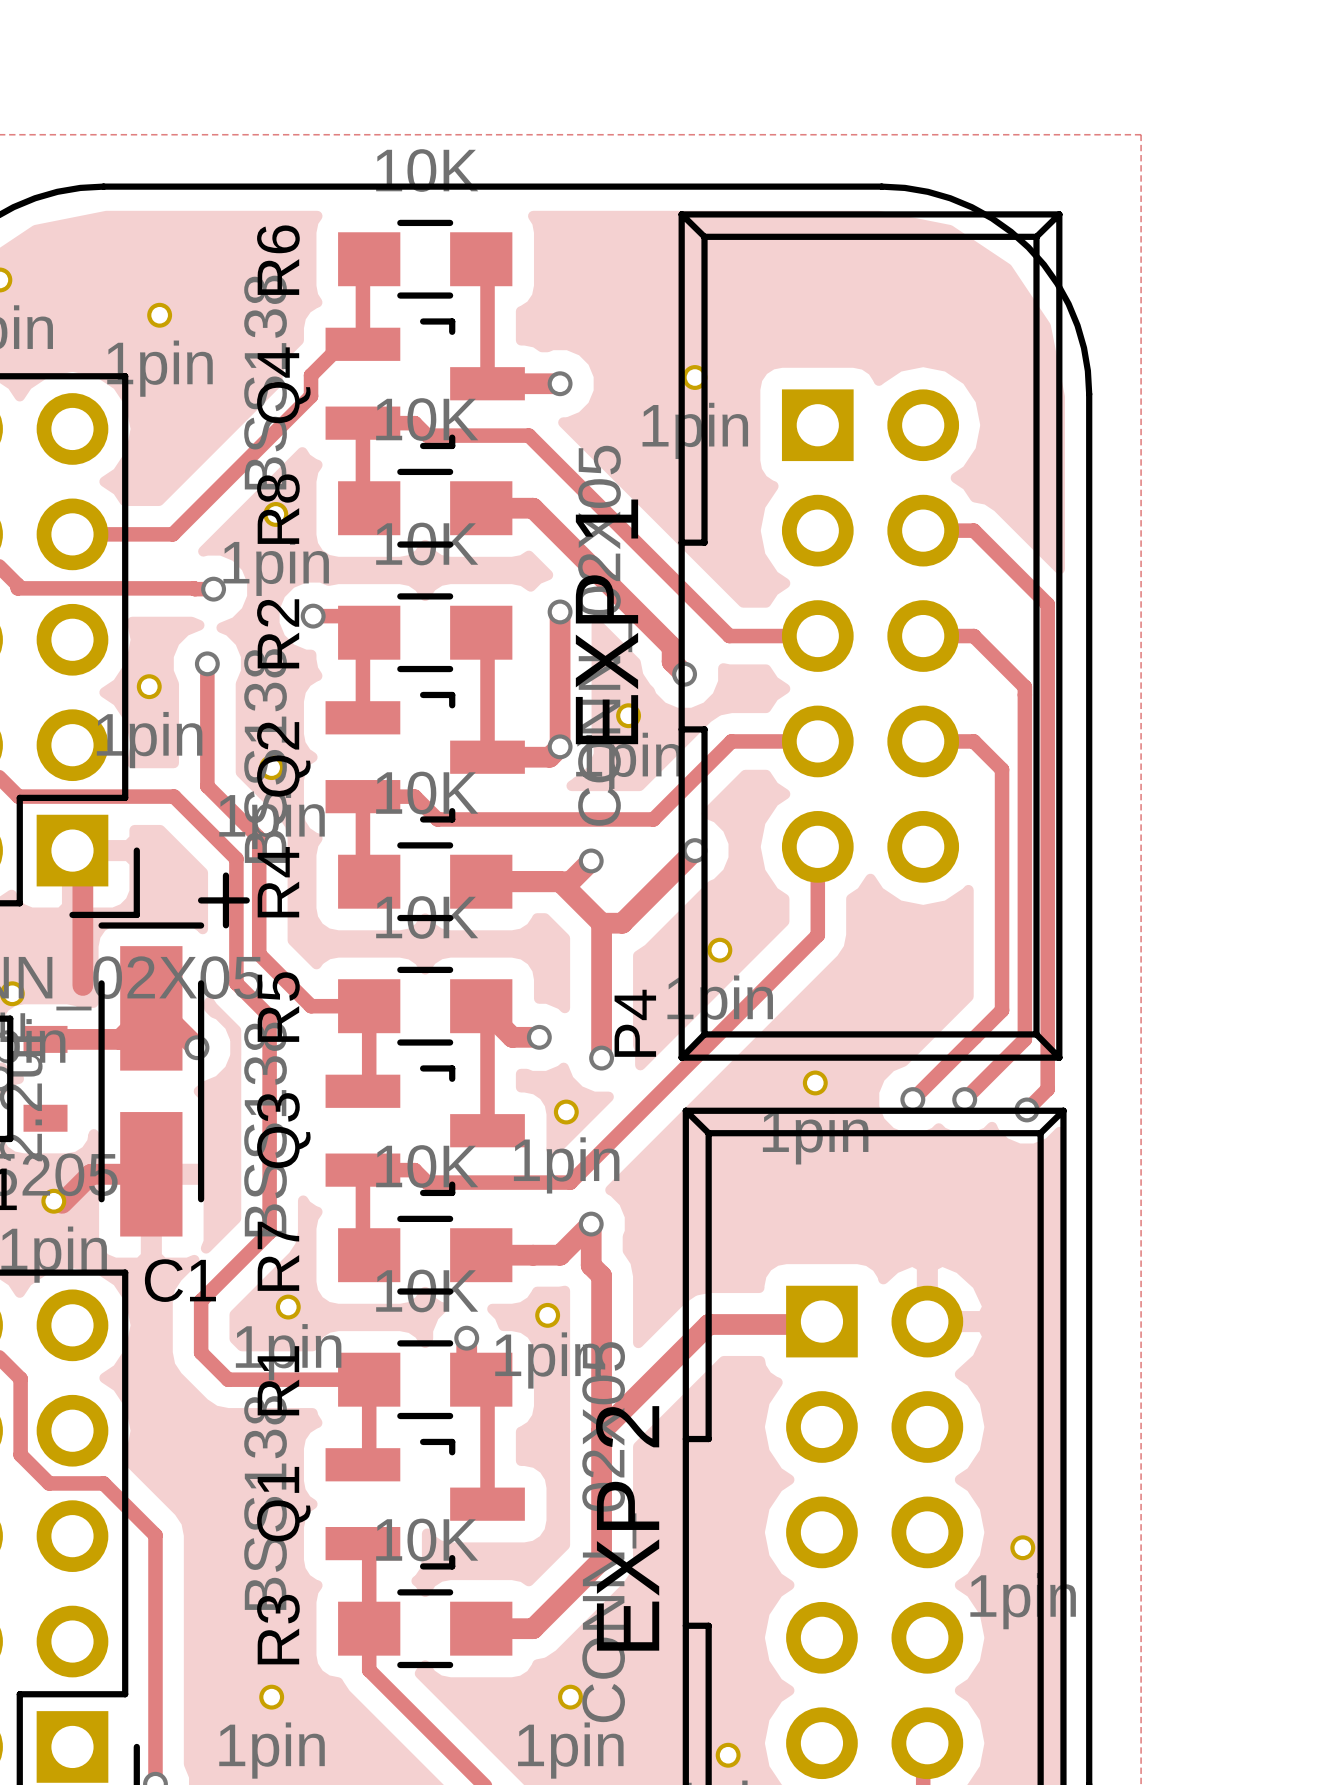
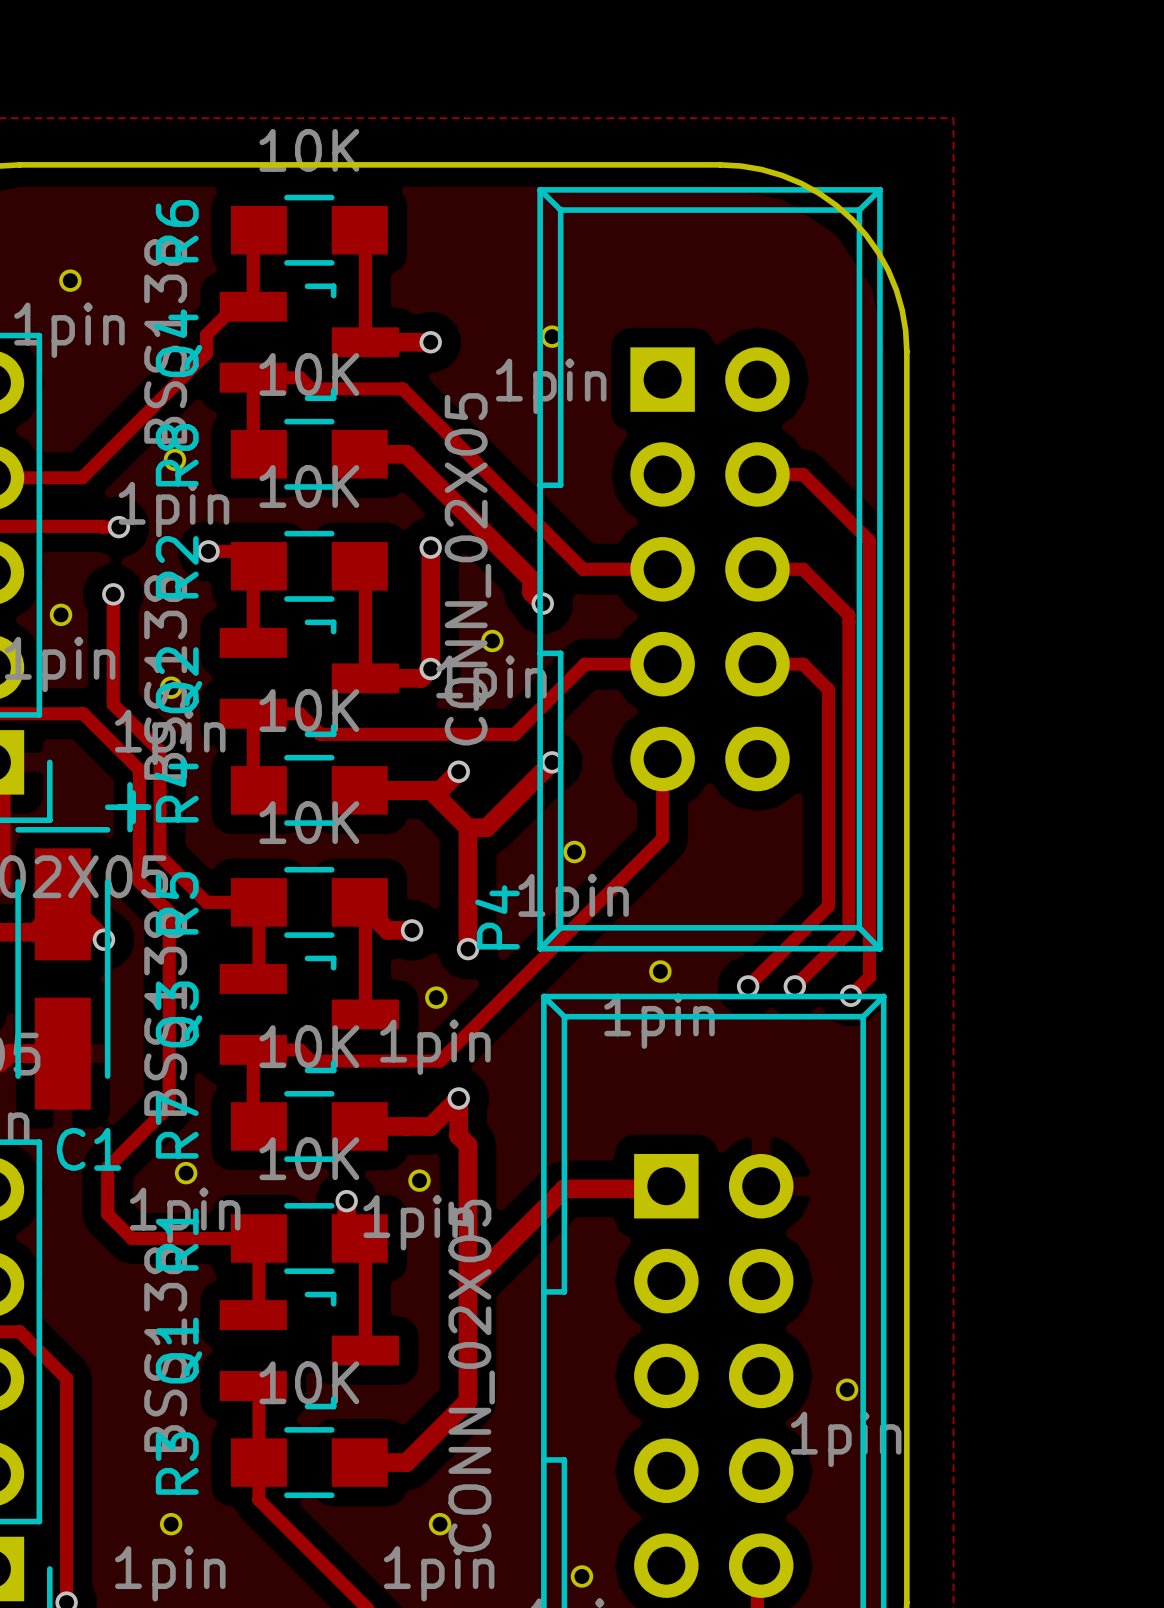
text: EXP 1 (606, 621) -> none
text: EXP 2 (627, 1528) -> none

